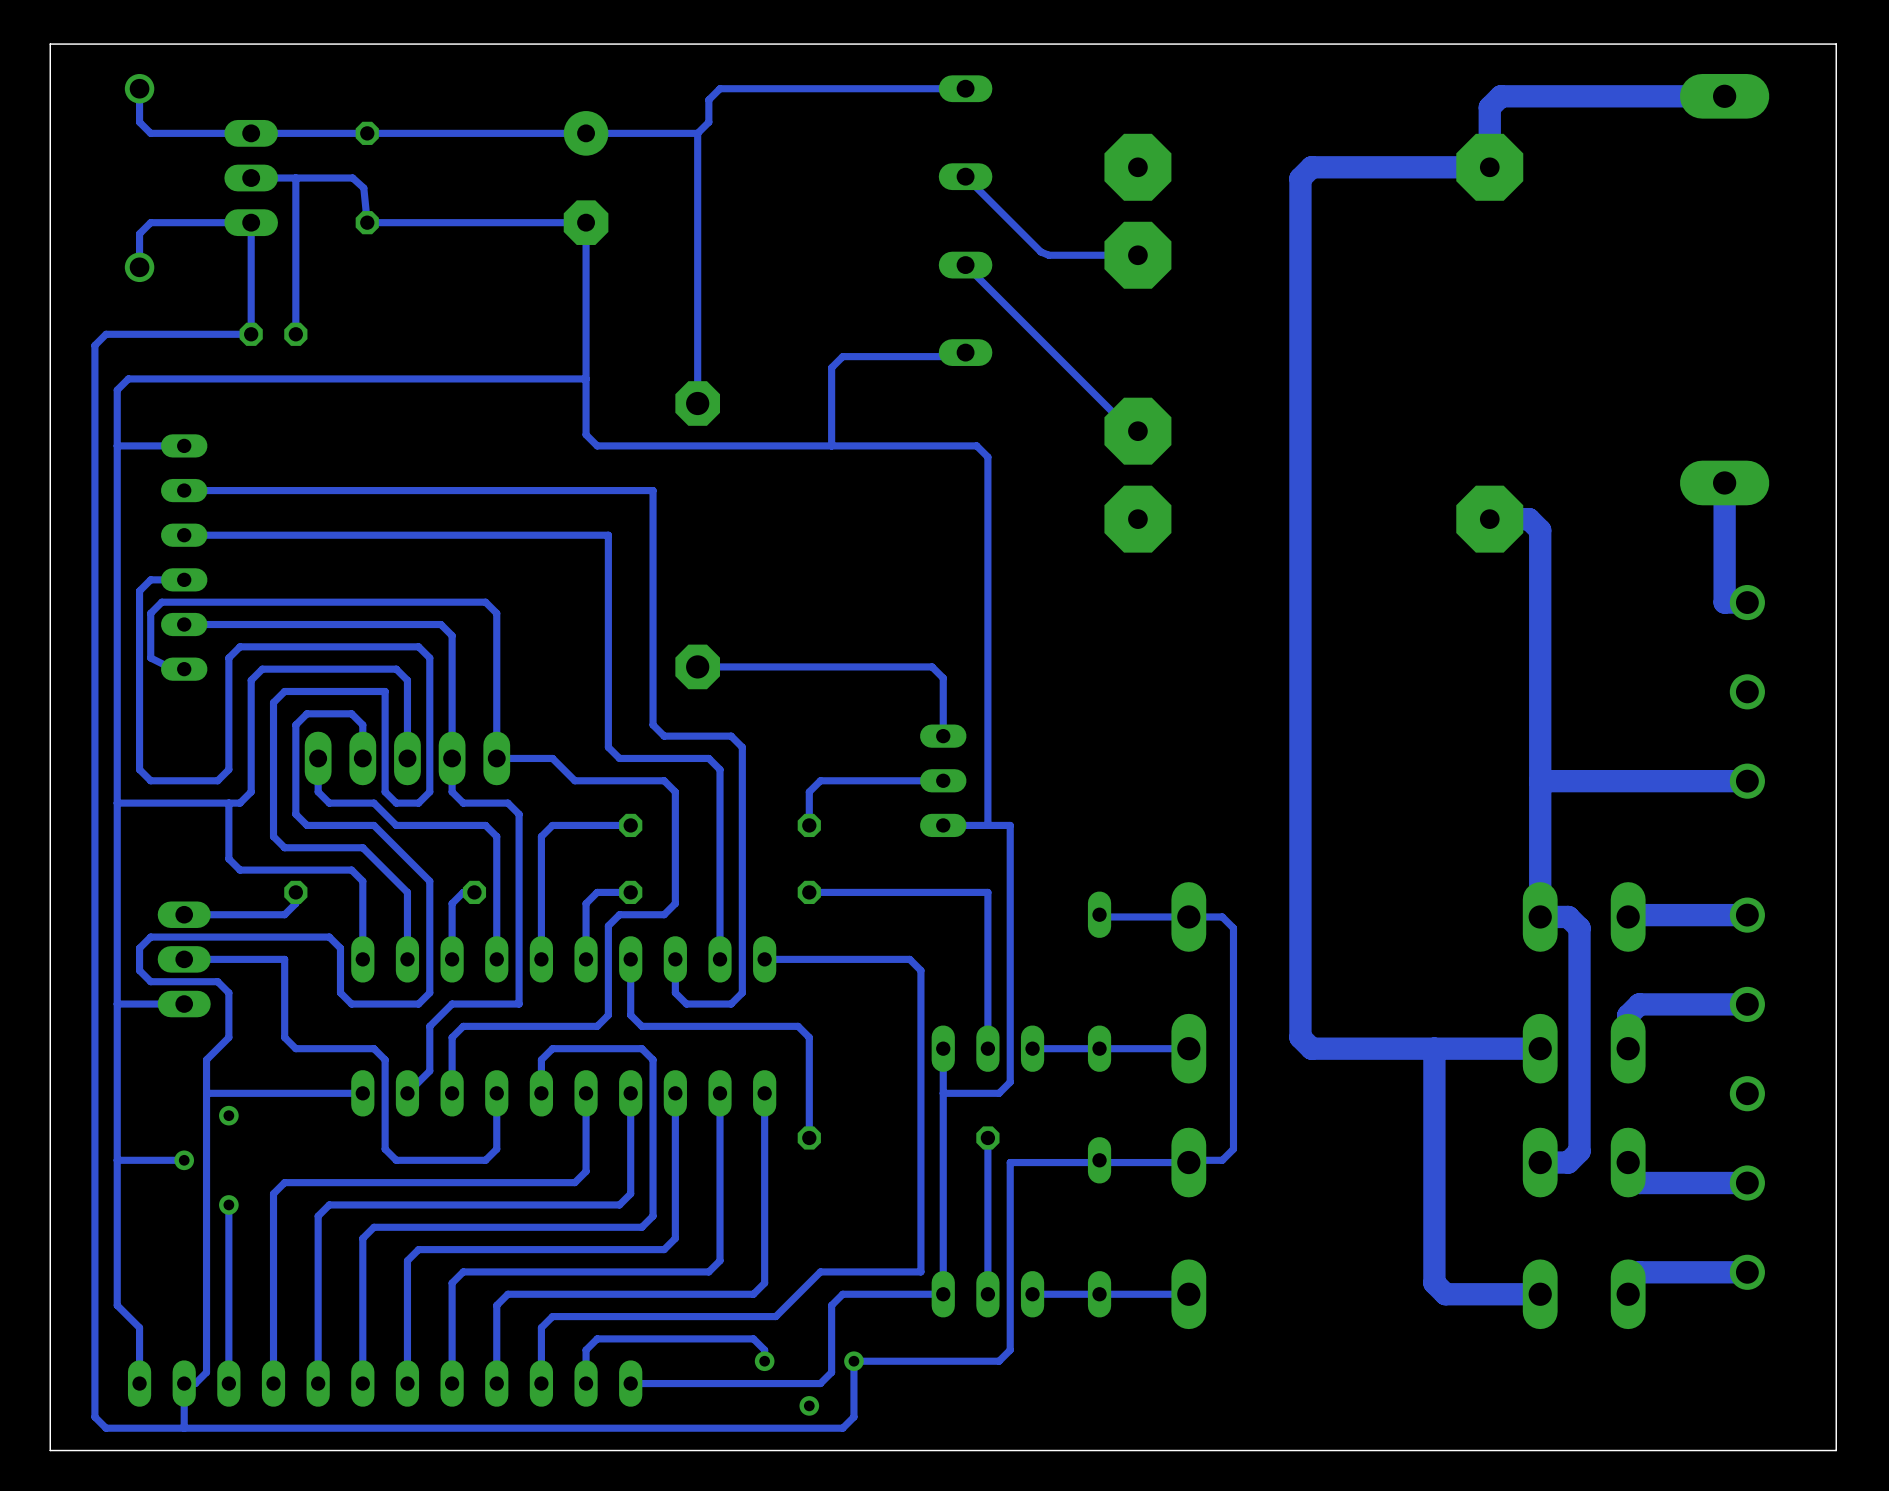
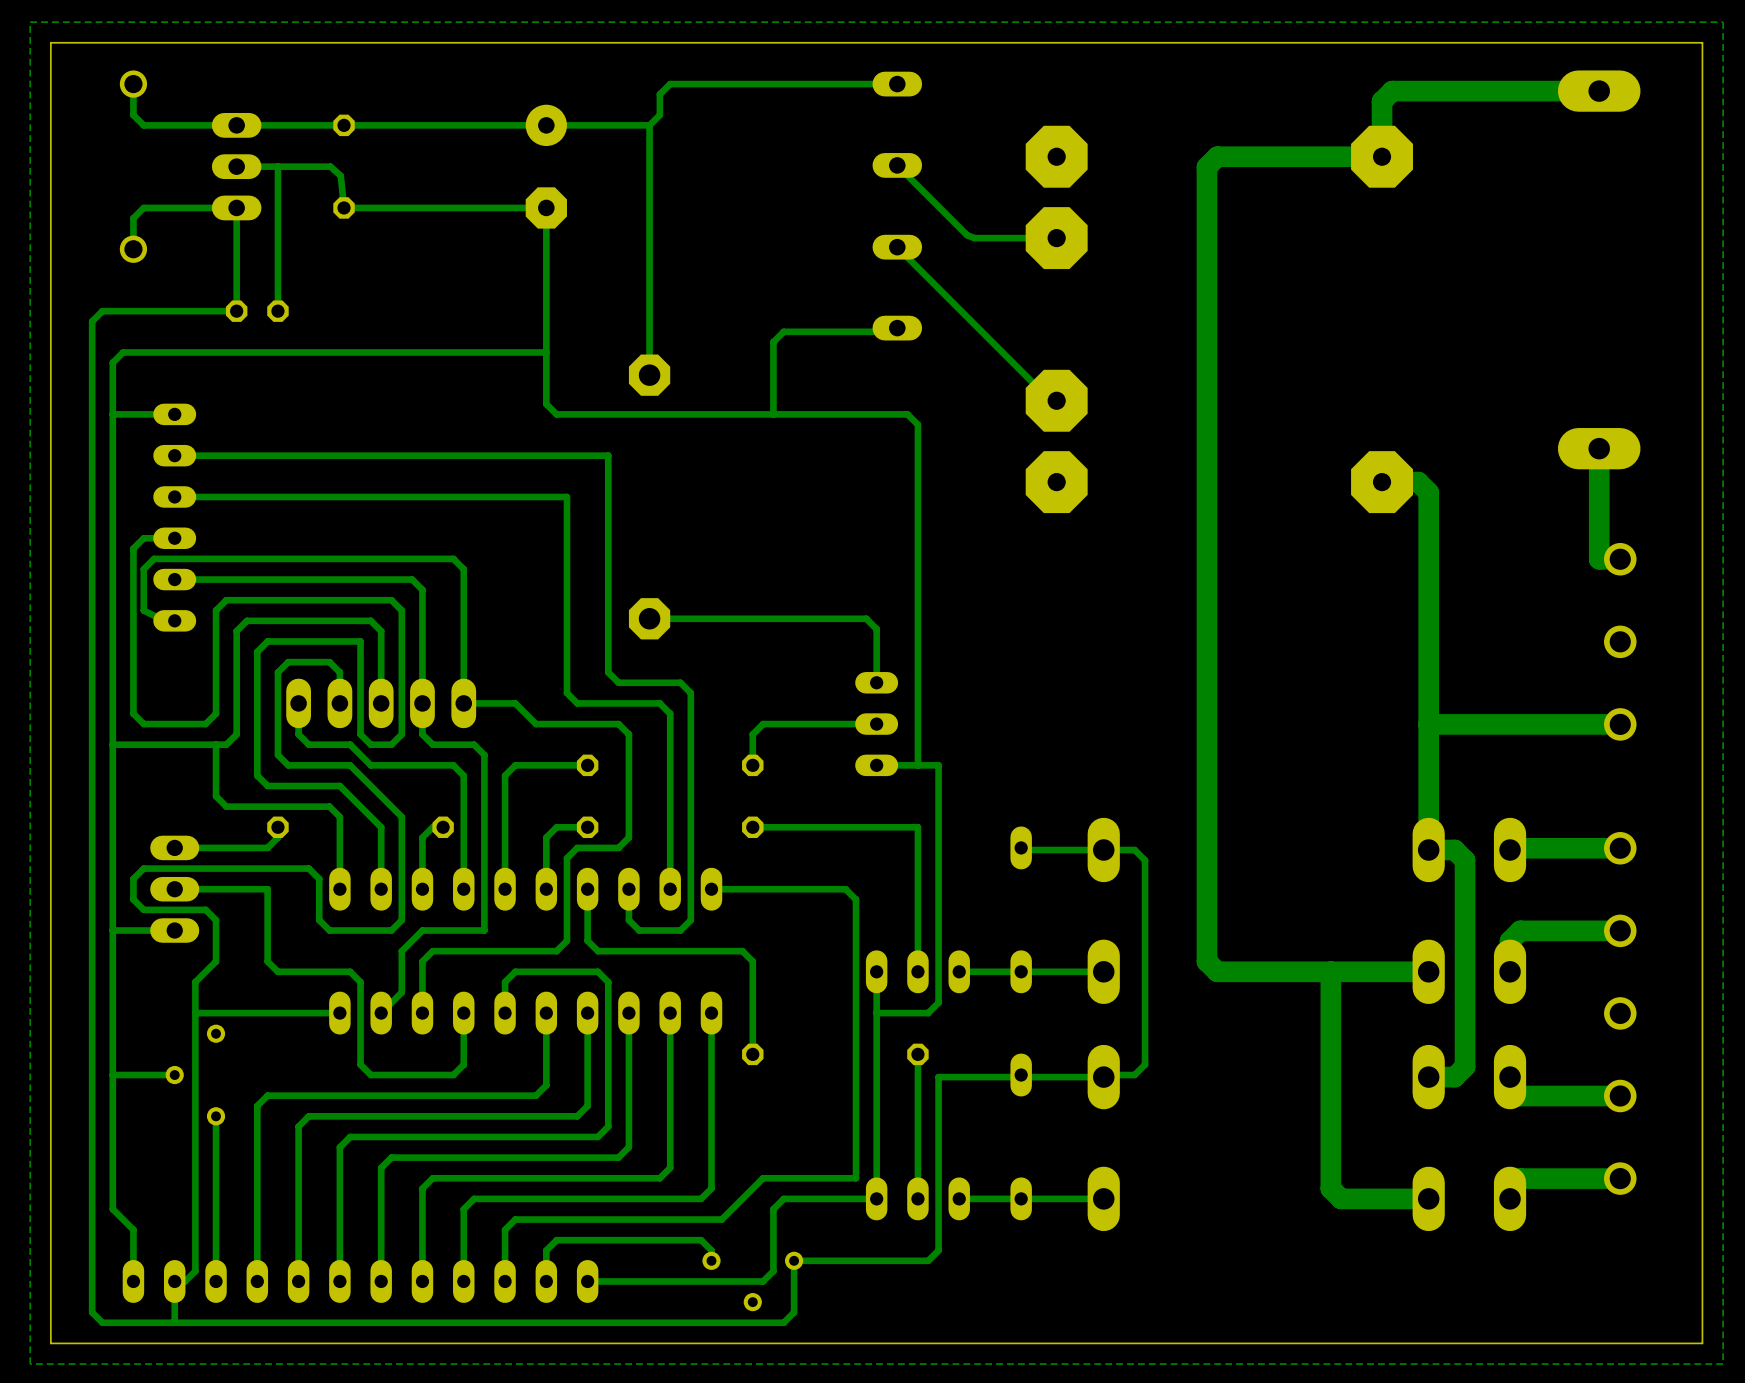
zone outline: none -> (1723, 22) (1723, 1364) (30, 1364) (30, 22) (1723, 22)

